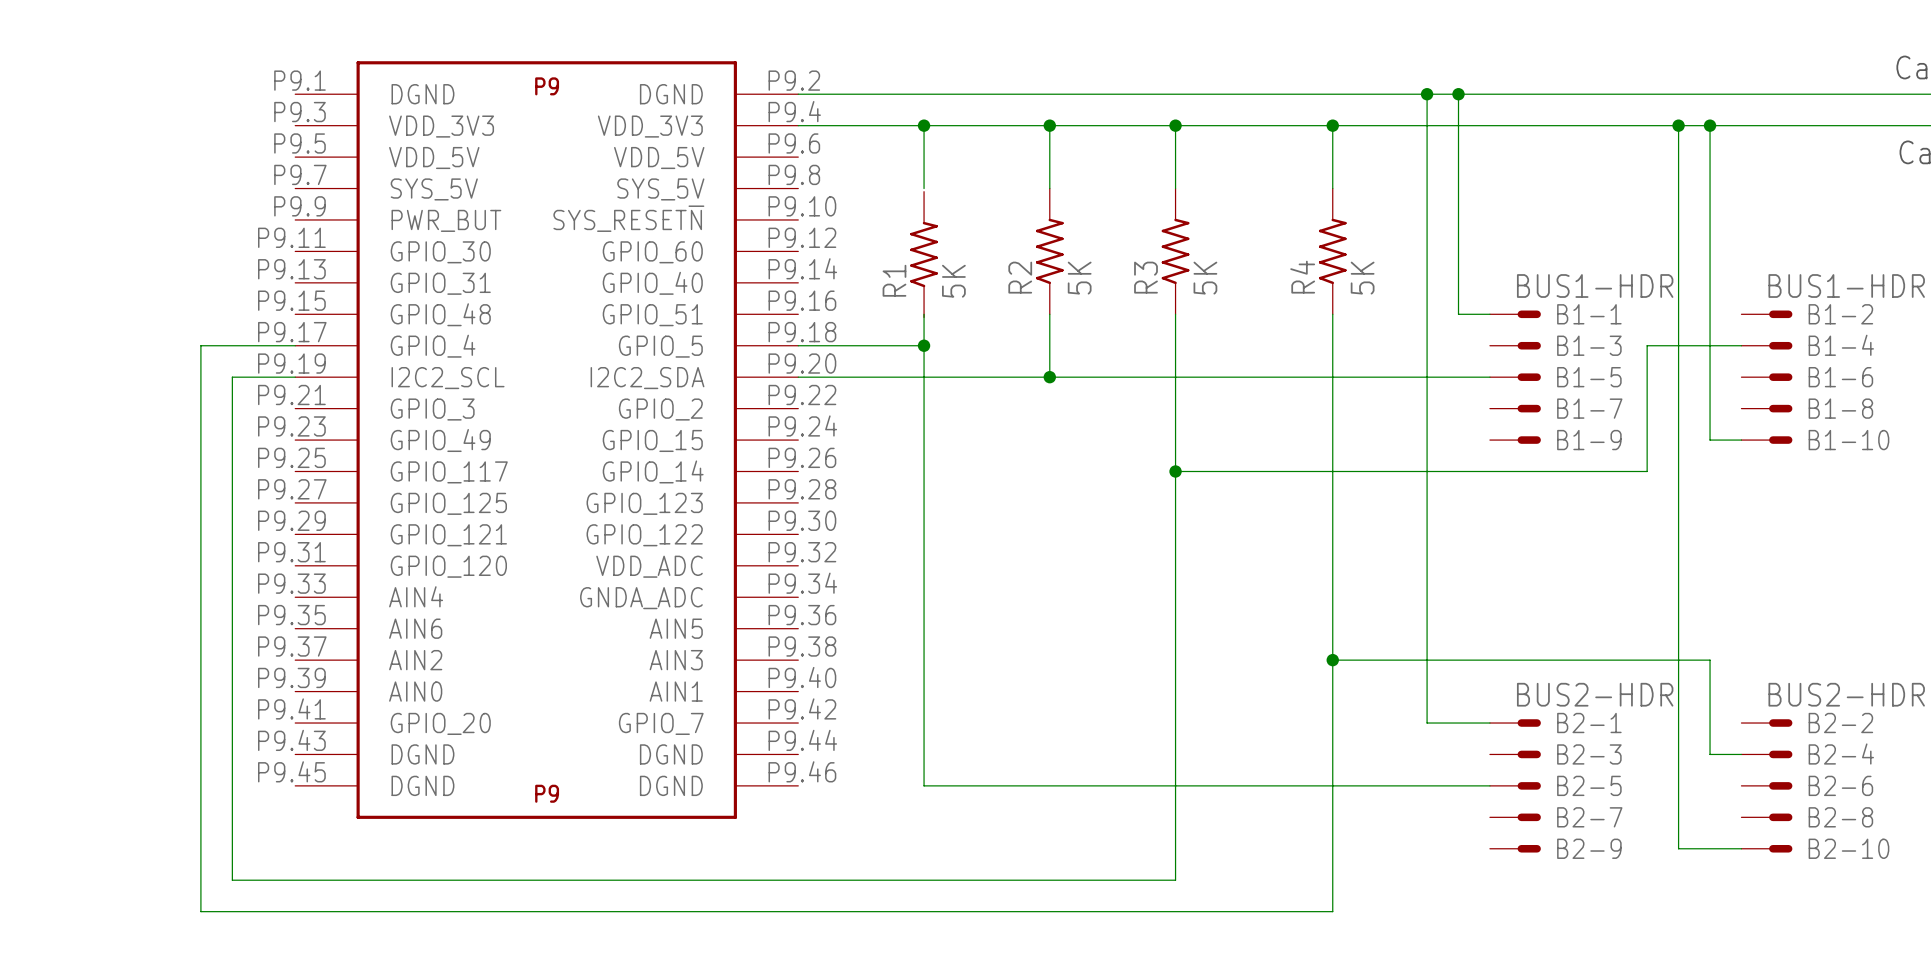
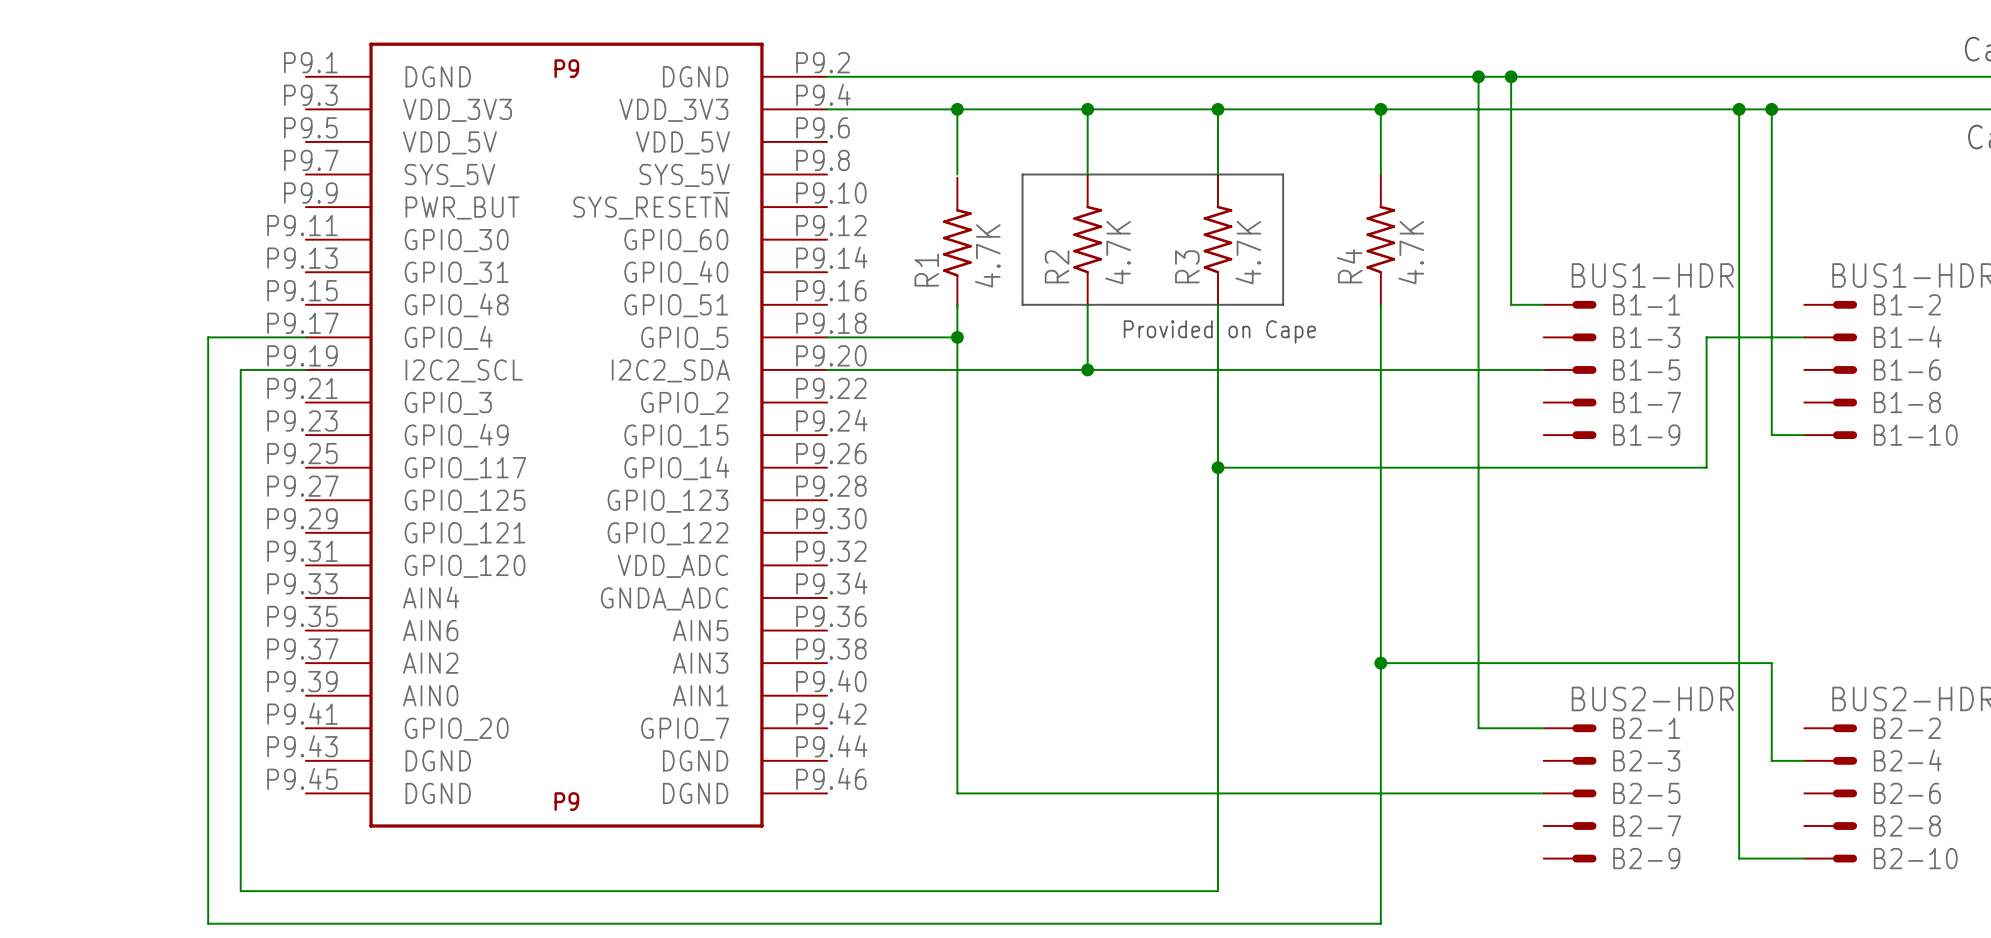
line: none -> (1022, 174) (1283, 174) (1283, 304) (1022, 304) (1022, 174)
R2 value: 5K (1079, 278) -> 4.7K (1118, 252)
R3 value: 5K (1205, 278) -> 4.7K (1248, 252)
R4 value: 5K (1362, 278) -> 4.7K (1411, 252)
R1 value: 5K (953, 281) -> 4.7K (987, 255)
text: none -> Provided on Cape (1219, 331)

